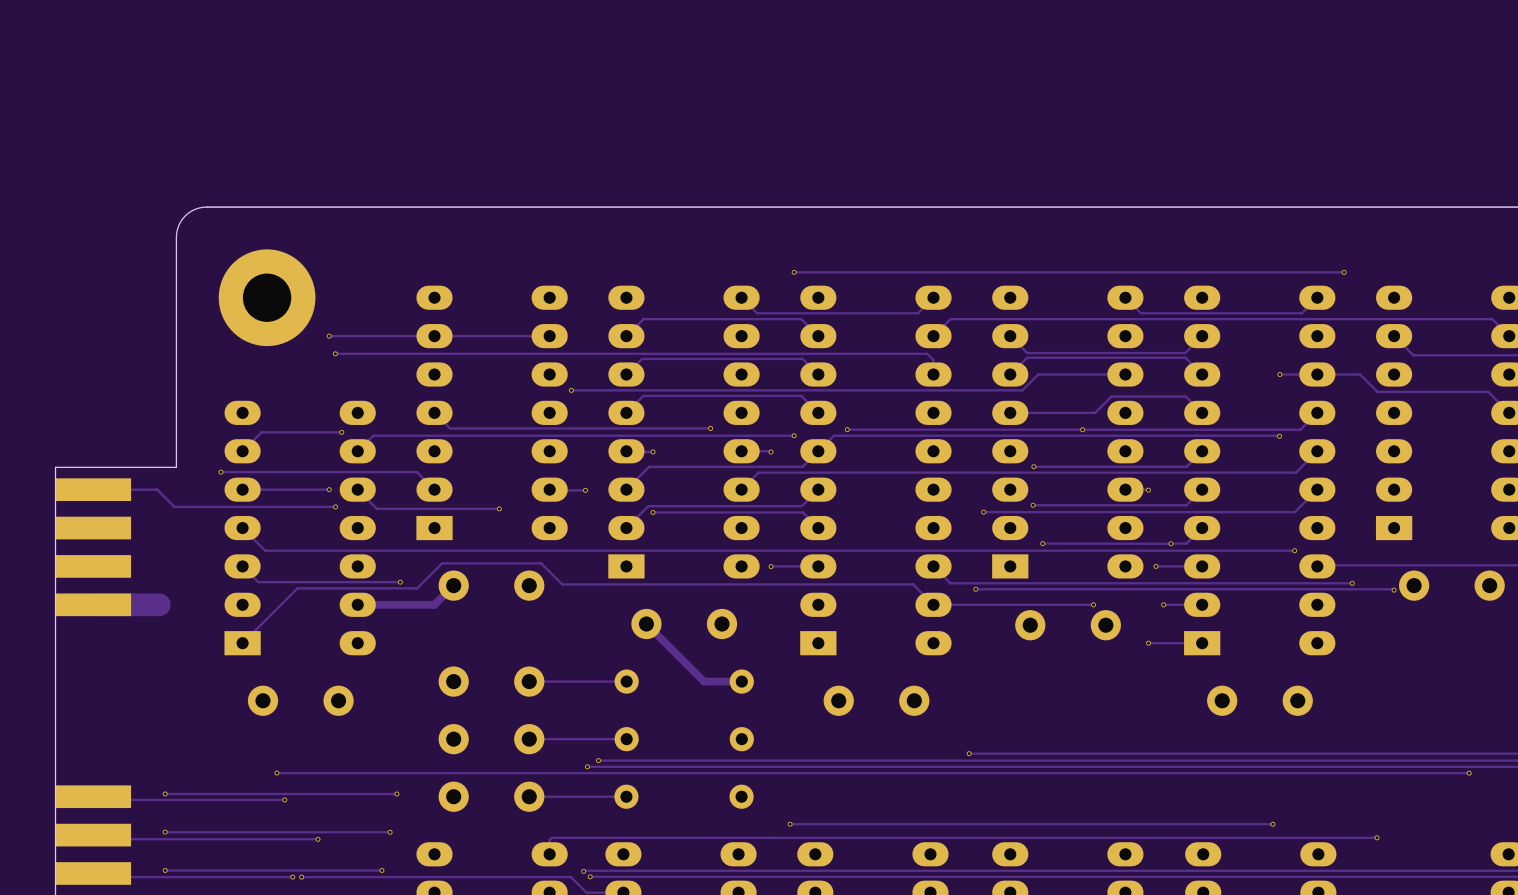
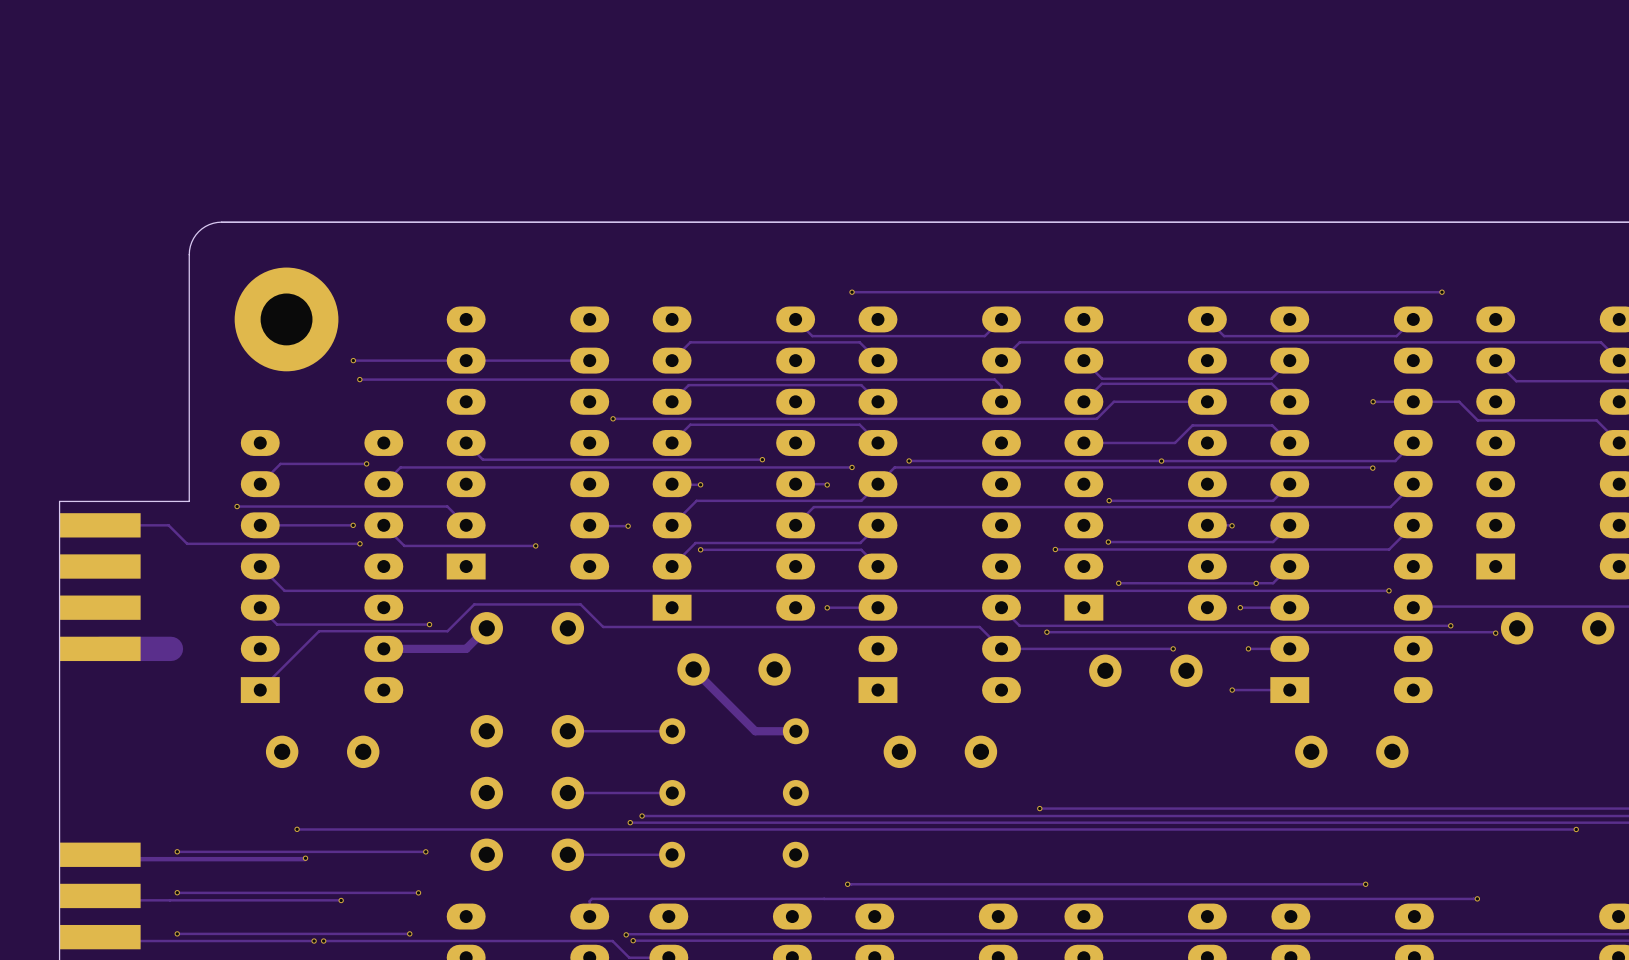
track: none -> (305, 860) (107, 860)

